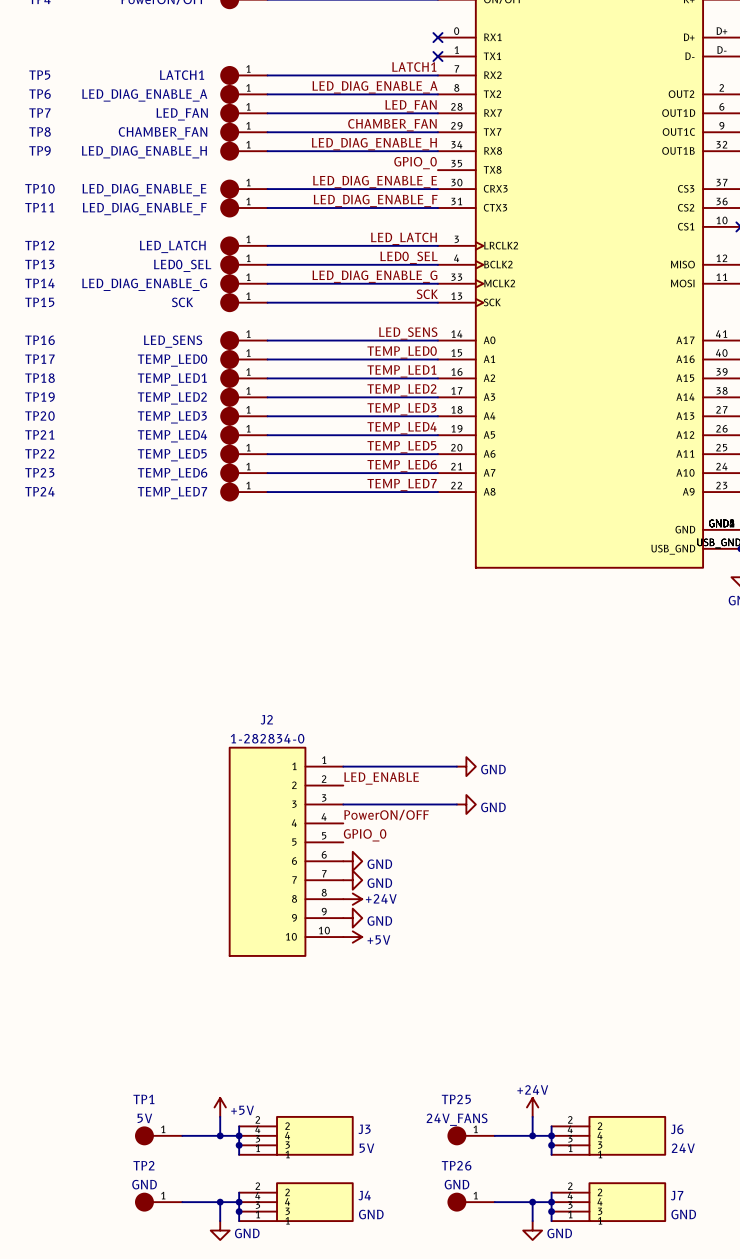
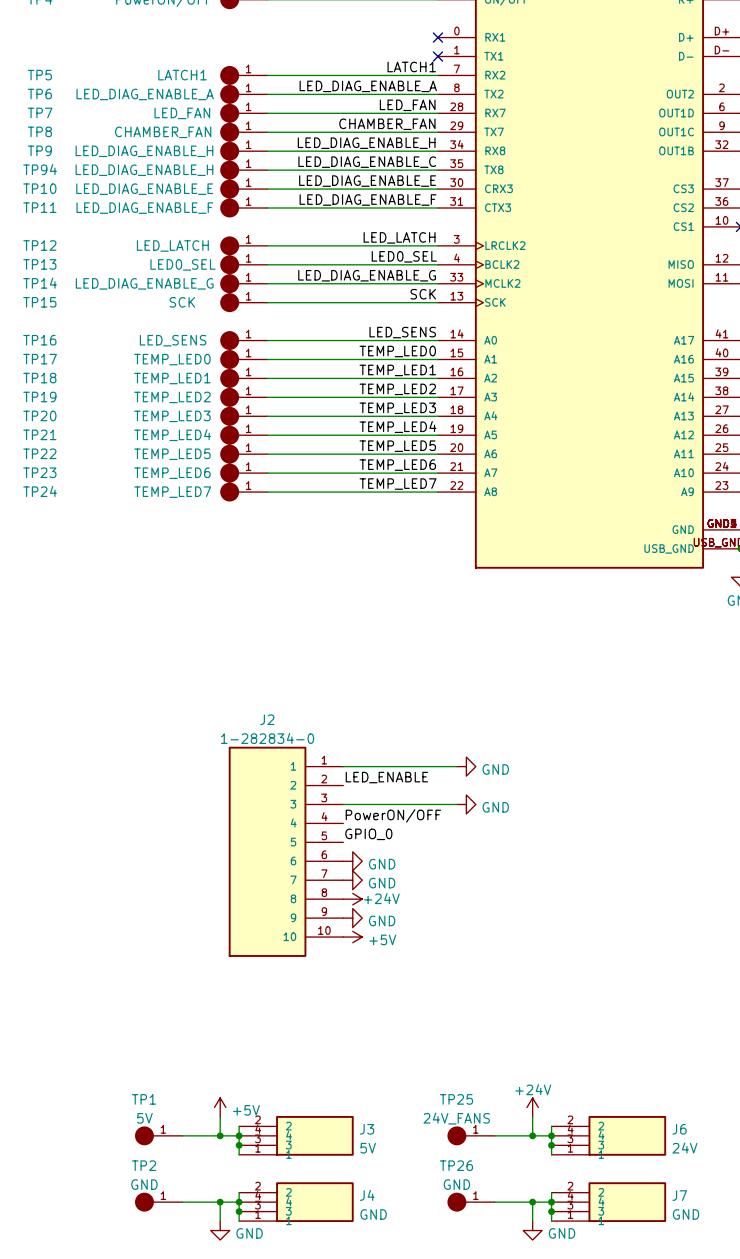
label: none -> LED_DIAG_ENABLE_C (367, 162)
label: GPIO_0 (415, 163) -> none
TP94: none -> LED_DIAG_ENABLE_H (243, 170)
wire: none -> (267, 170) (437, 170)

